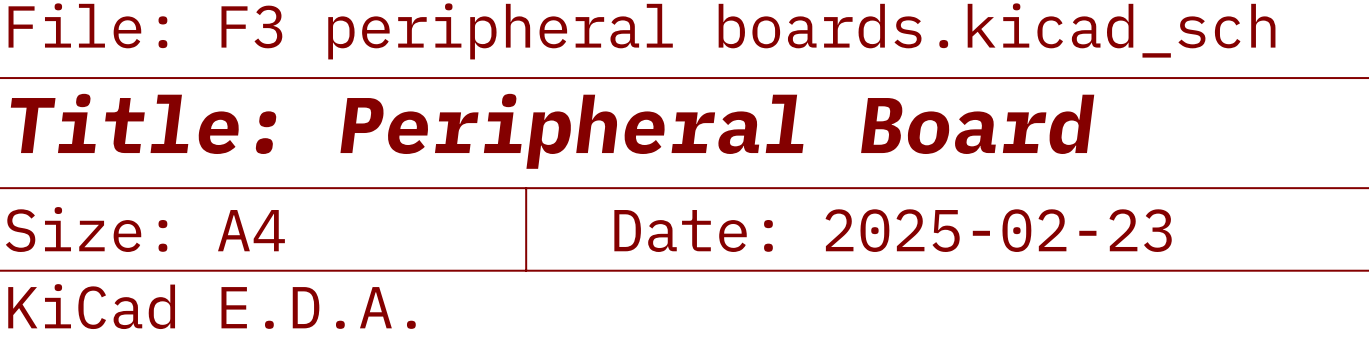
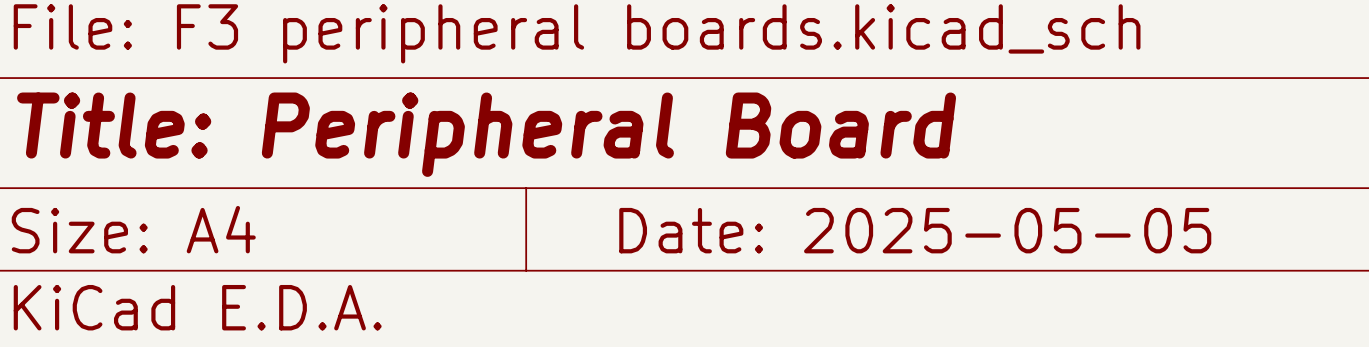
title block: Date: 2025-02-23 (893, 230) -> Date: 2025-05-05 (915, 230)

